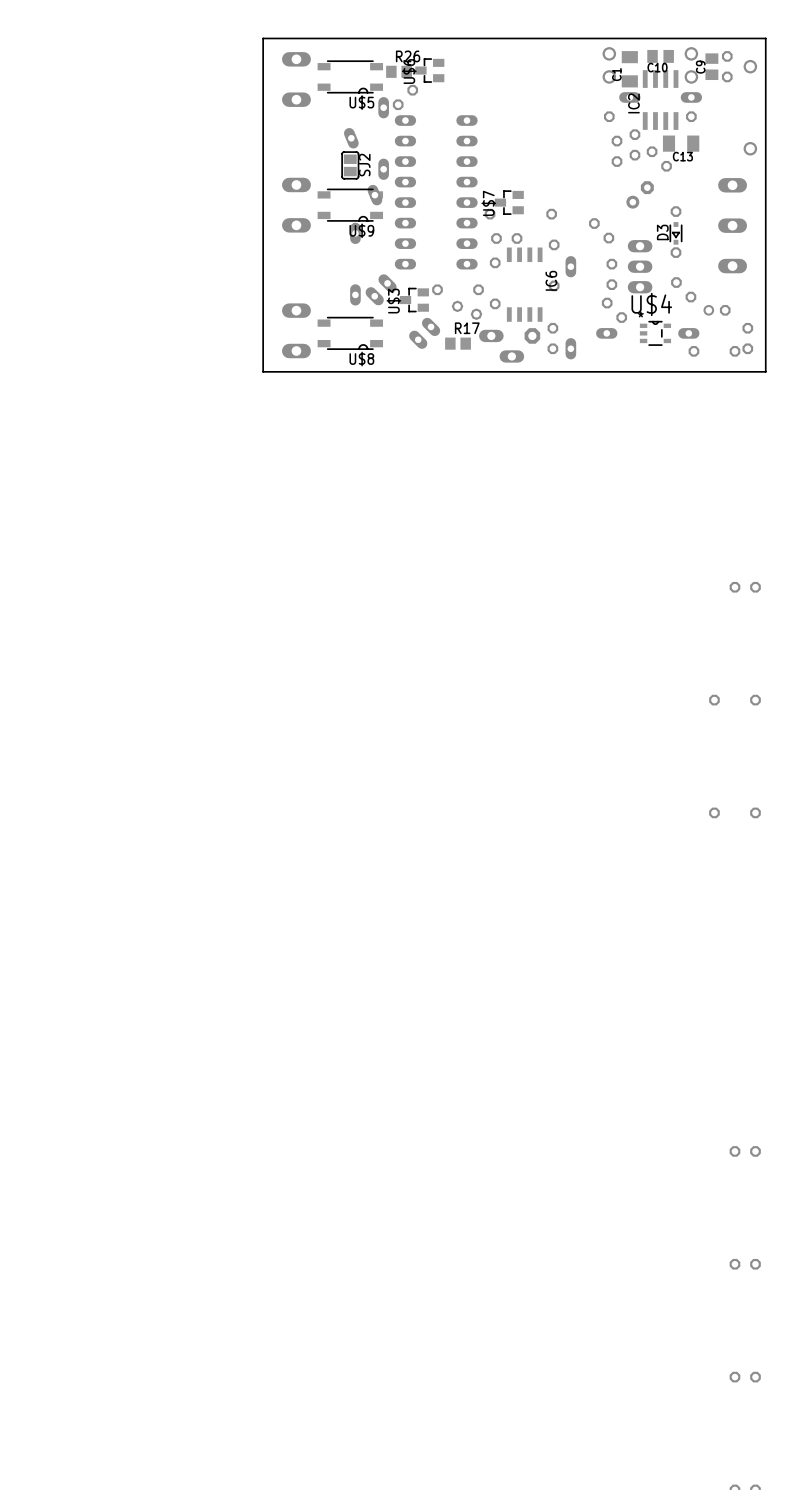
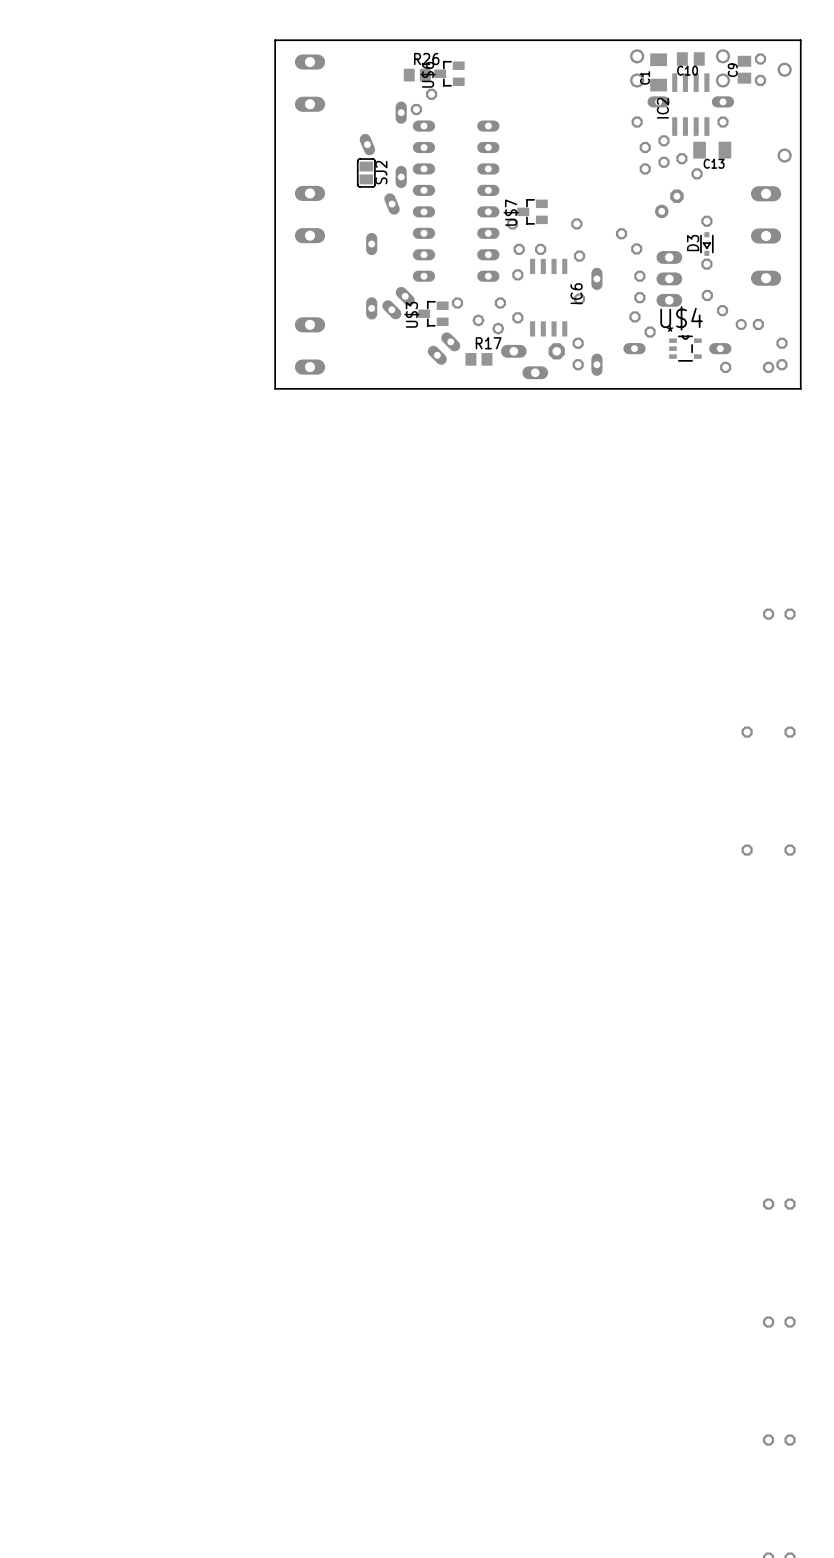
U$5: (350, 76) -> none
U$9: (350, 205) -> none
U$8: (350, 333) -> none

